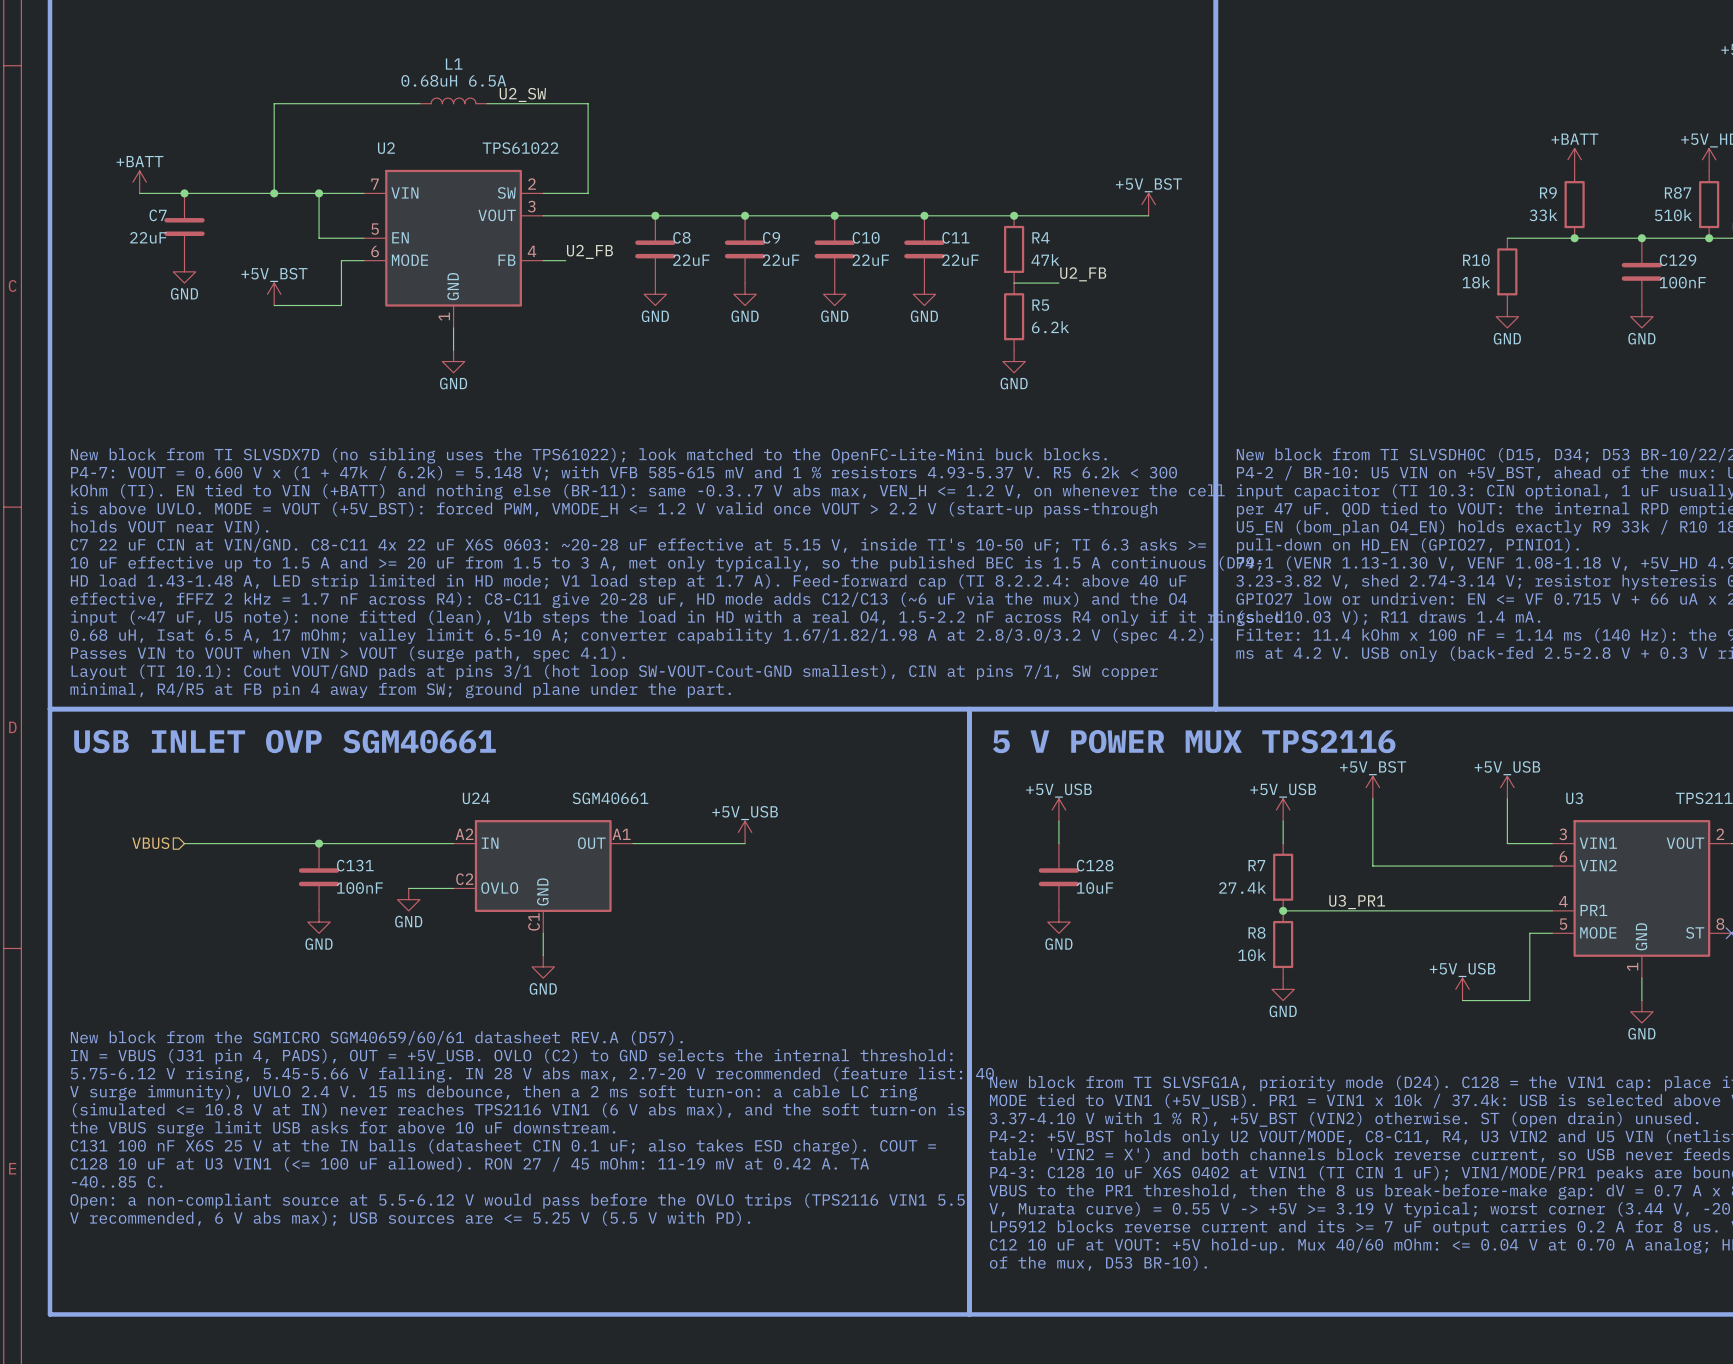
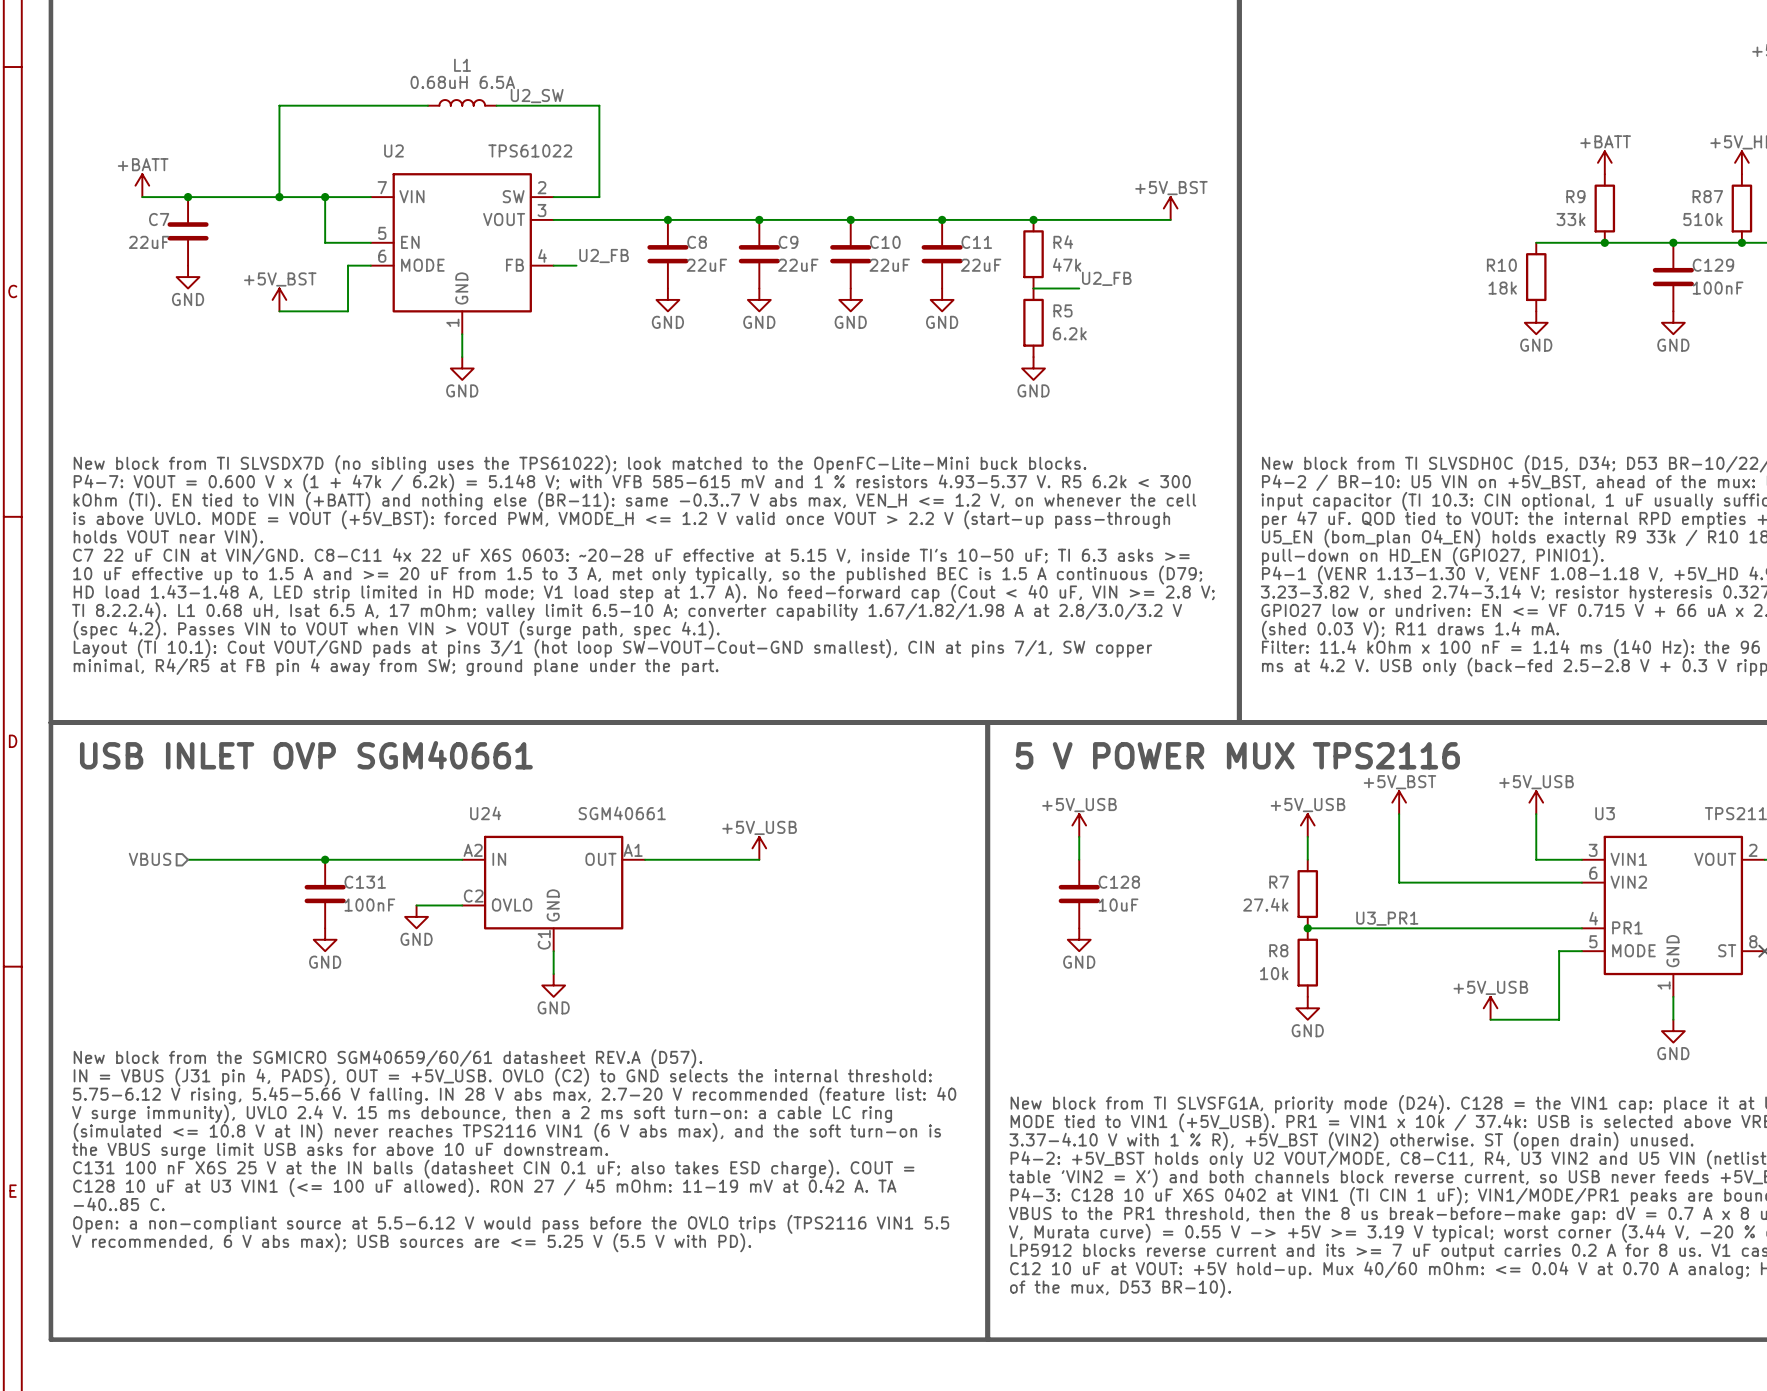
text: HD load 1.43-1.48 A, LED strip limited in HD mode; V1 load step at 1.7 A). Feed-forward cap (TI 8.2.2.4: above 40 uF (628, 582) -> HD load 1.43-1.48 A, LED strip limited in HD mode; V1 load step at 1.7 A). No feed-forward cap (Cout < 40 uF, VIN >= 2.8 V; (644, 593)
text: effective, fFFZ 2 kHz = 1.7 nF across R4): C8-C11 give 20-28 uF, HD mode adds C12/C13 (~6 uF via the mux) and the O4 (628, 600) -> TI 8.2.2.4). L1 0.68 uH, Isat 6.5 A, 17 mOhm; valley limit 6.5-10 A; converter capability 1.67/1.82/1.98 A at 2.8/3.0/3.2 V (627, 611)
text: input (~47 uF, U5 note): none fitted (lean), V1b steps the load in HD with a real O4, 1.5-2.2 nF across R4 only if it rings. L1 (682, 618) -> (spec 4.2). Passes VIN to VOUT when VIN > VOUT (surge path, spec 4.1). (396, 630)
text: 0.68 uH, Isat 6.5 A, 17 mOhm; valley limit 6.5-10 A; converter capability 1.67/1.82/1.98 A at 2.8/3.0/3.2 V (spec 4.2). (641, 636) -> Layout (TI 10.1): Cout VOUT/GND pads at pins 3/1 (hot loop SW-VOUT-Cout-GND smallest), CIN at pins 7/1, SW copper (612, 648)
text: Passes VIN to VOUT when VIN > VOUT (surge path, spec 4.1). (347, 654) -> minimal, R4/R5 at FB pin 4 away from SW; ground plane under the part. (396, 667)
text: Layout (TI 10.1): Cout VOUT/GND pads at pins 3/1 (hot loop SW-VOUT-Cout-GND smallest), CIN at pins 7/1, SW copper (614, 672) -> none
text: minimal, R4/R5 at FB pin 4 away from SW; ground plane under the part. (400, 690) -> none

